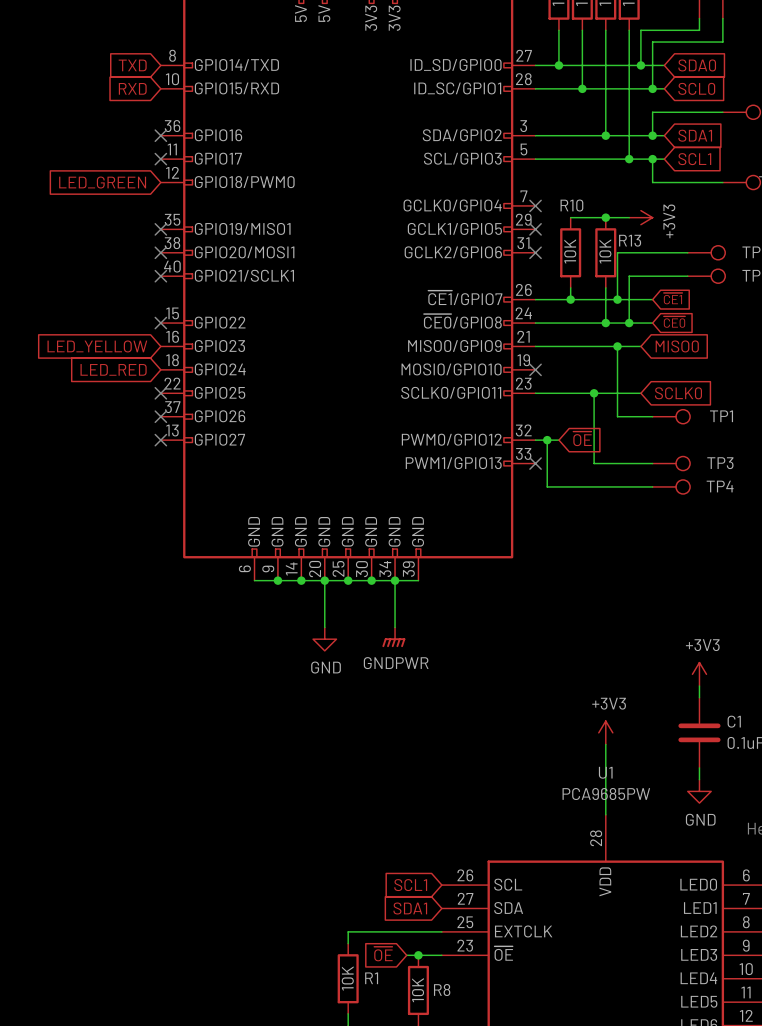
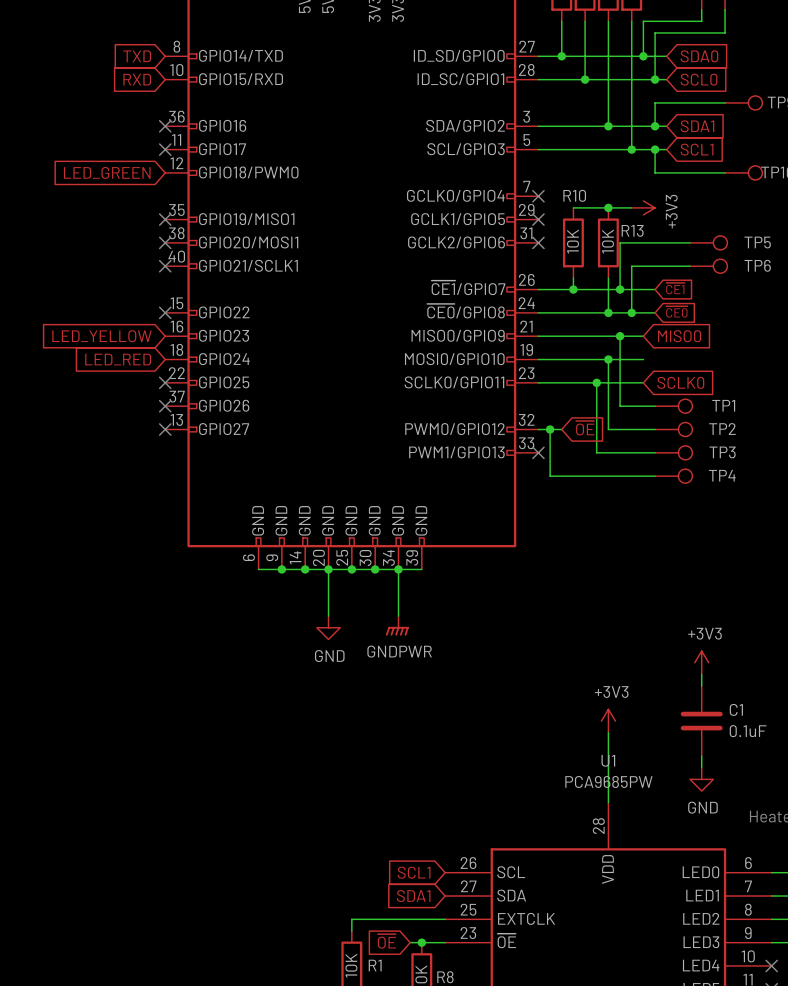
wire: none -> (538, 359) (643, 359)
no-connect mark: (535, 369) -> none
wire: none -> (608, 359) (608, 429) (655, 429)
junction: none -> (608, 359)
TP2: none -> (673, 429)

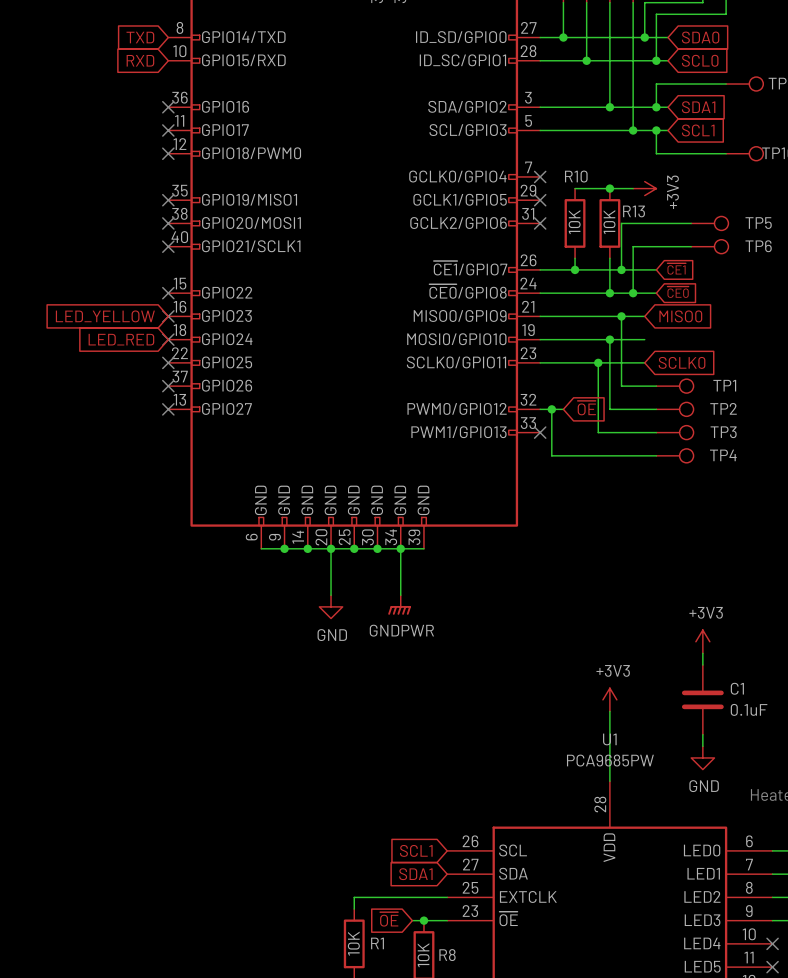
global label: LED_GREEN (107, 172) -> none
no-connect mark: none -> (168, 153)
no-connect mark: none -> (168, 316)
no-connect mark: none -> (168, 339)

